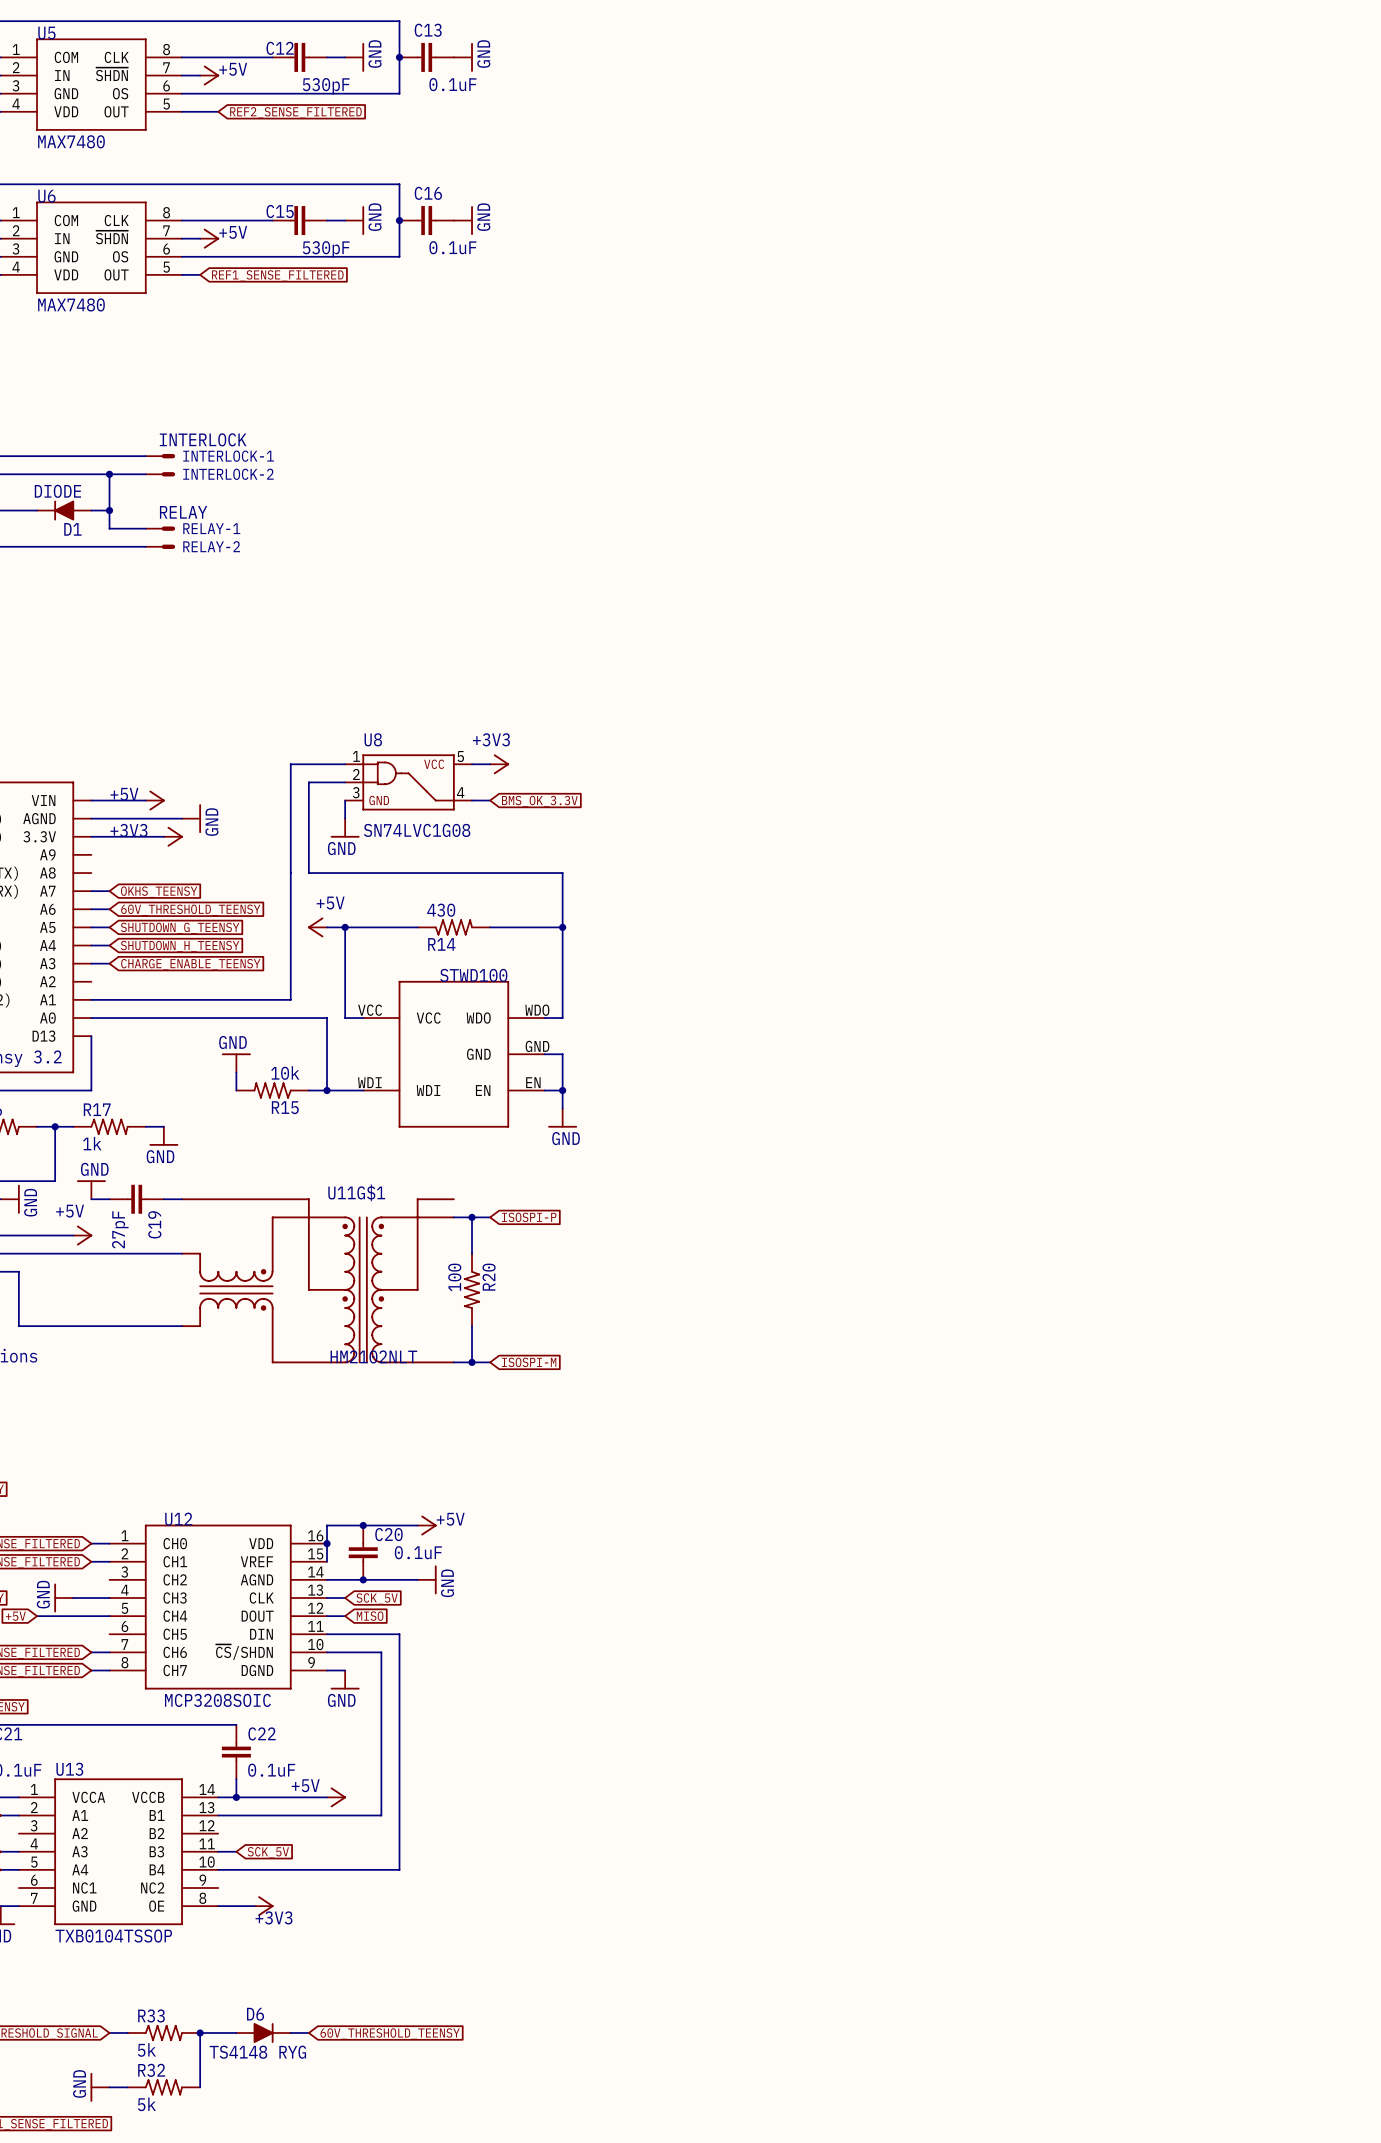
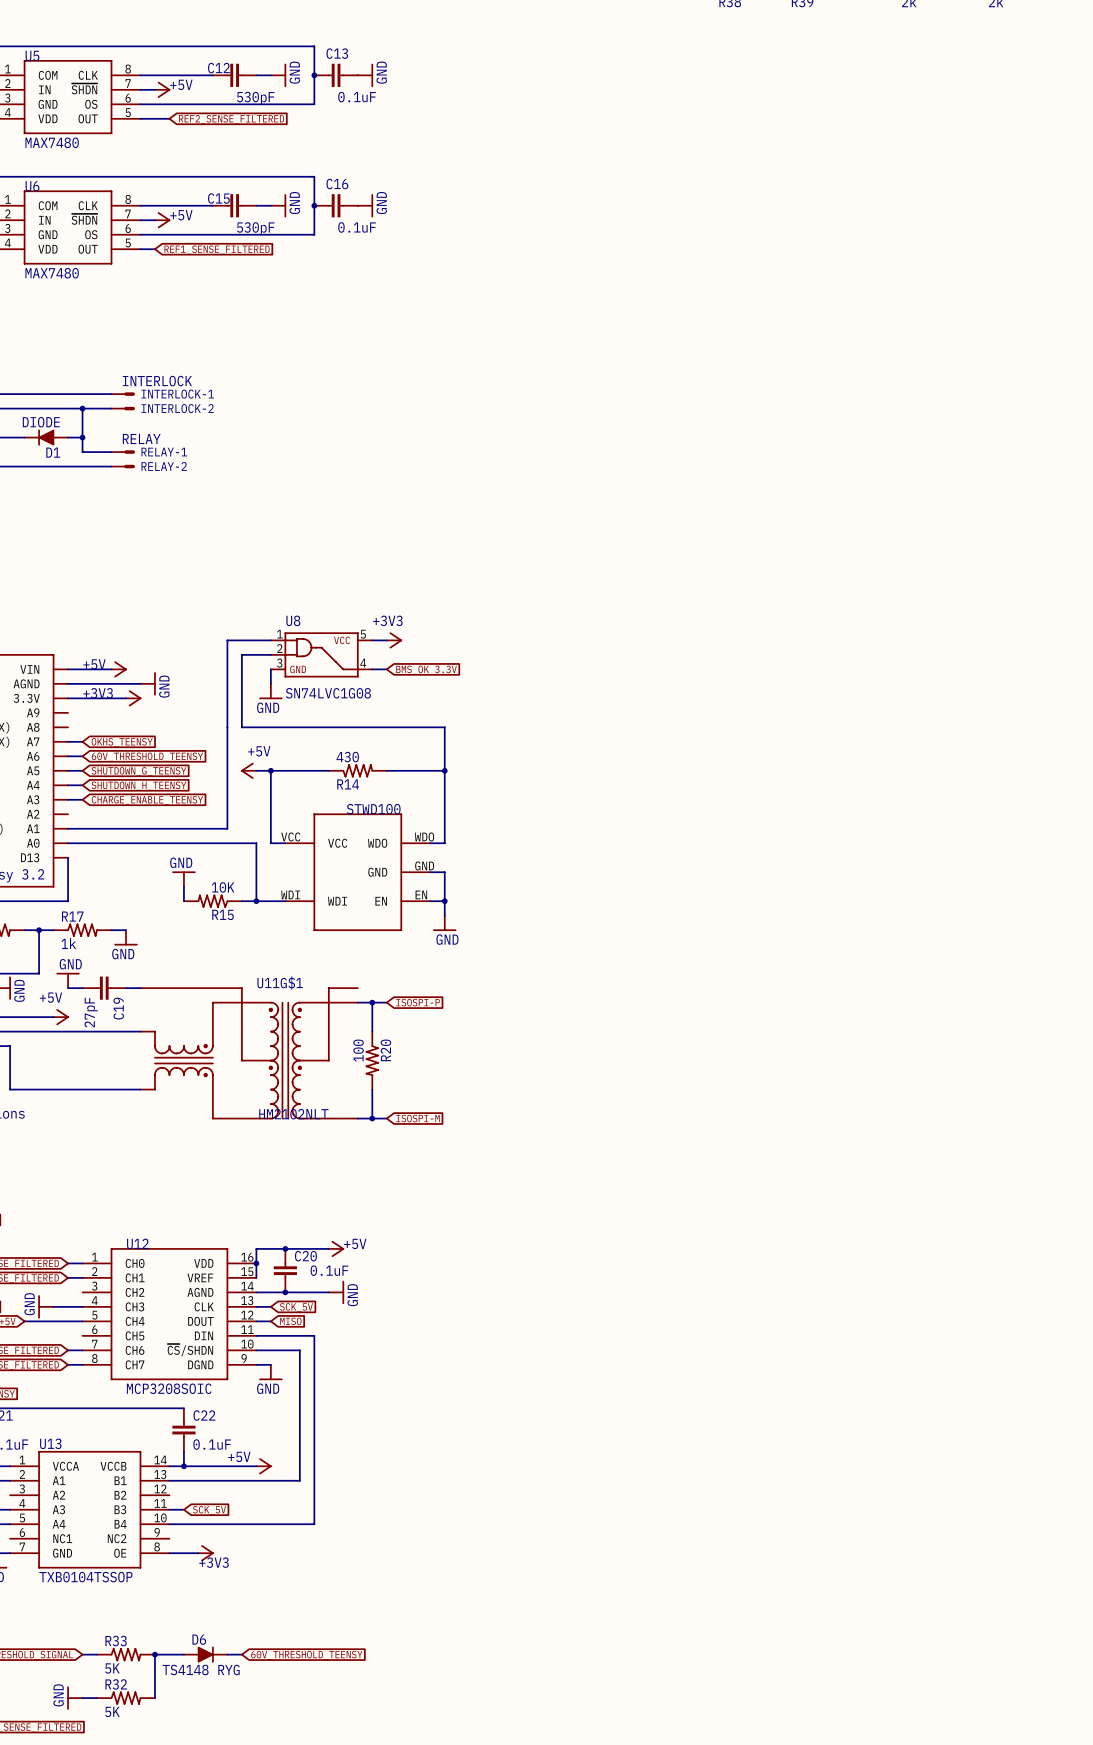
R15 value: 10k (285, 1073) -> 10K (223, 887)
R33 value: 5k (146, 2049) -> 5K (112, 1668)
R32 value: 5k (146, 2104) -> 5K (112, 1711)

